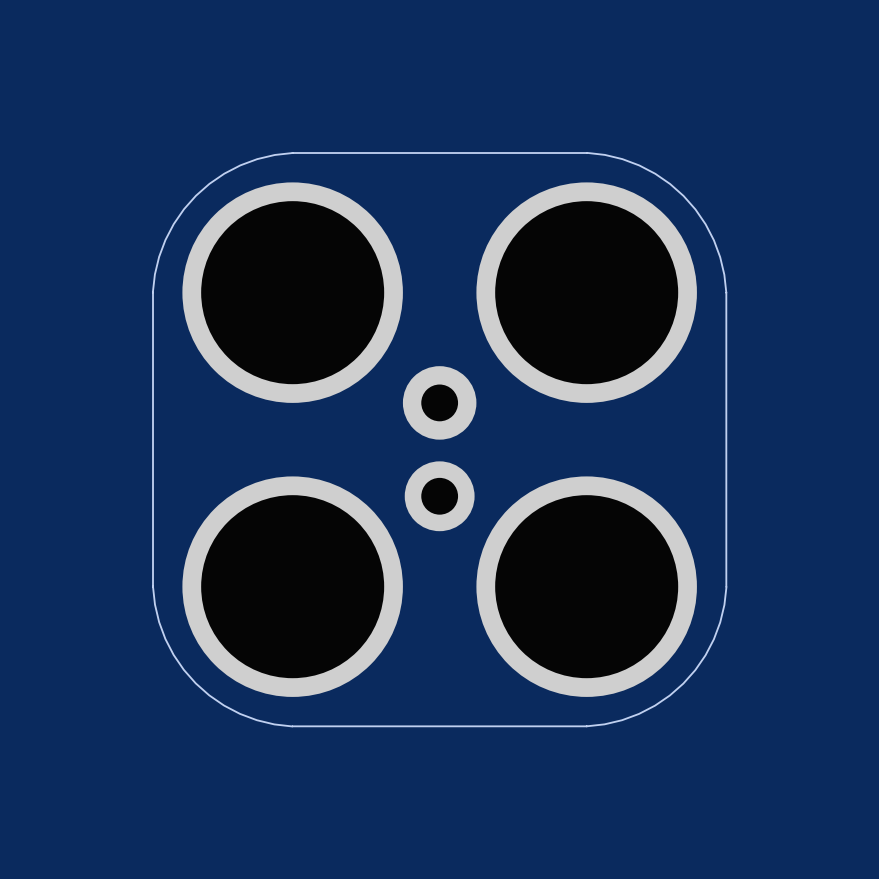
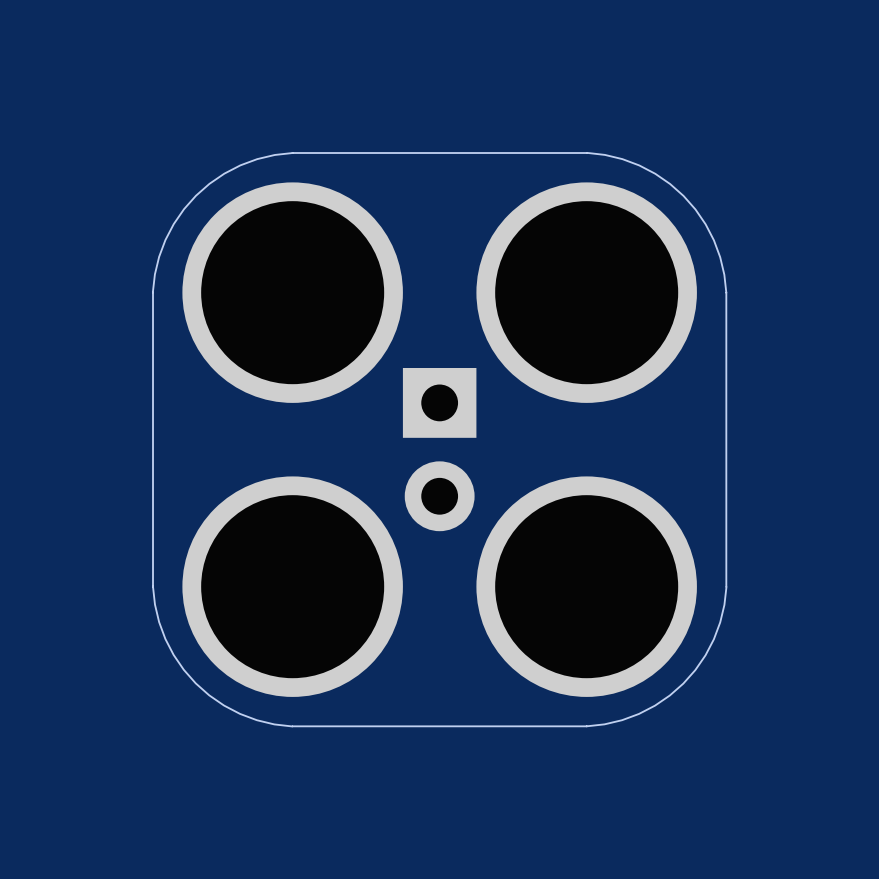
part footprint: [151, 151, 728, 728] -> [151, 151, 728, 728]

